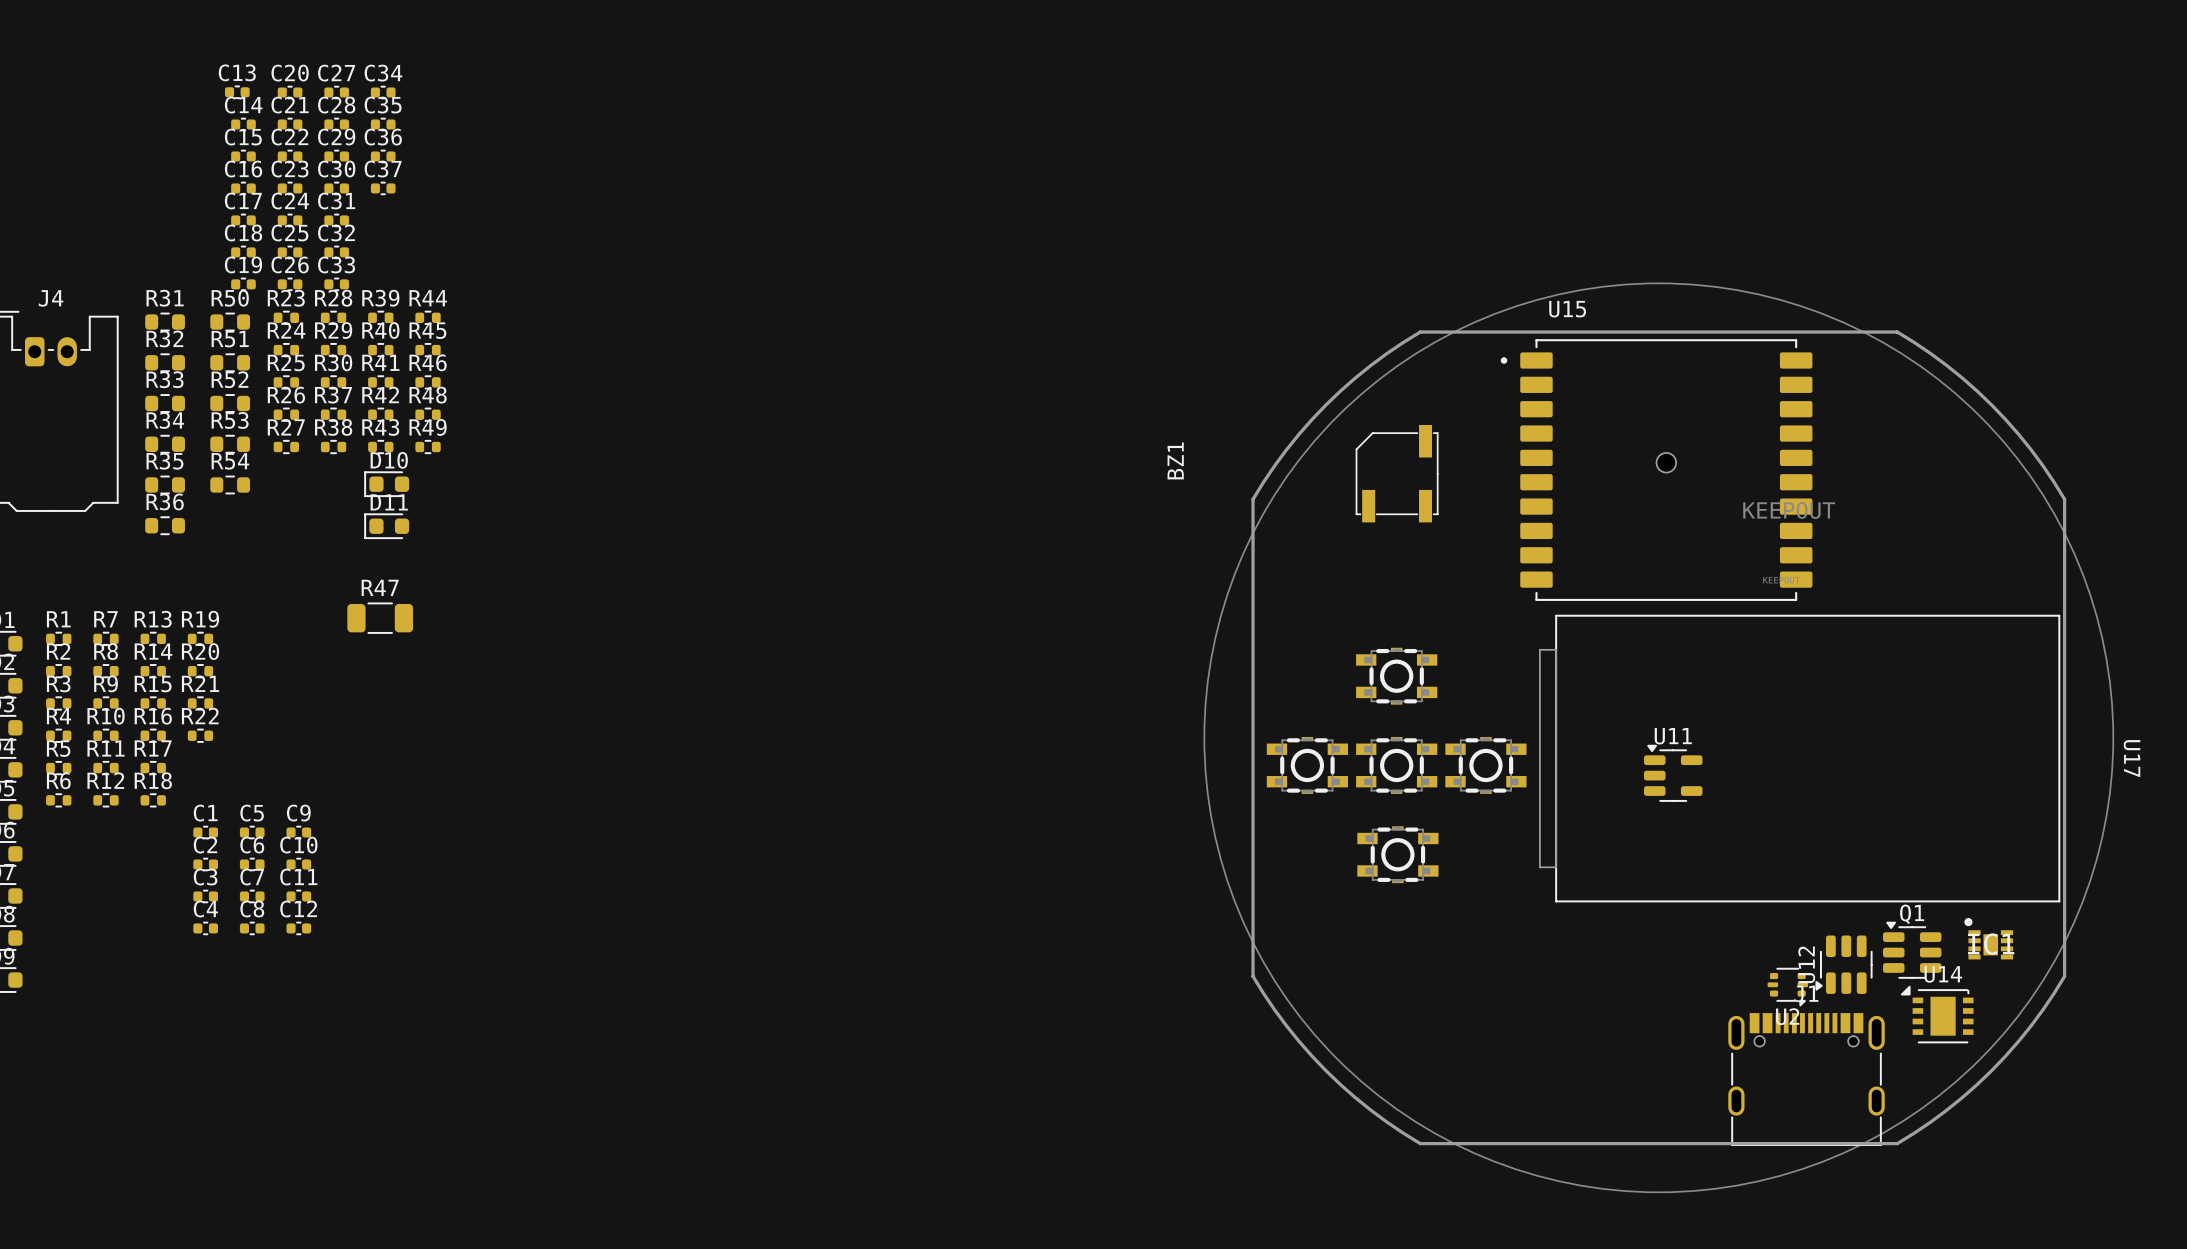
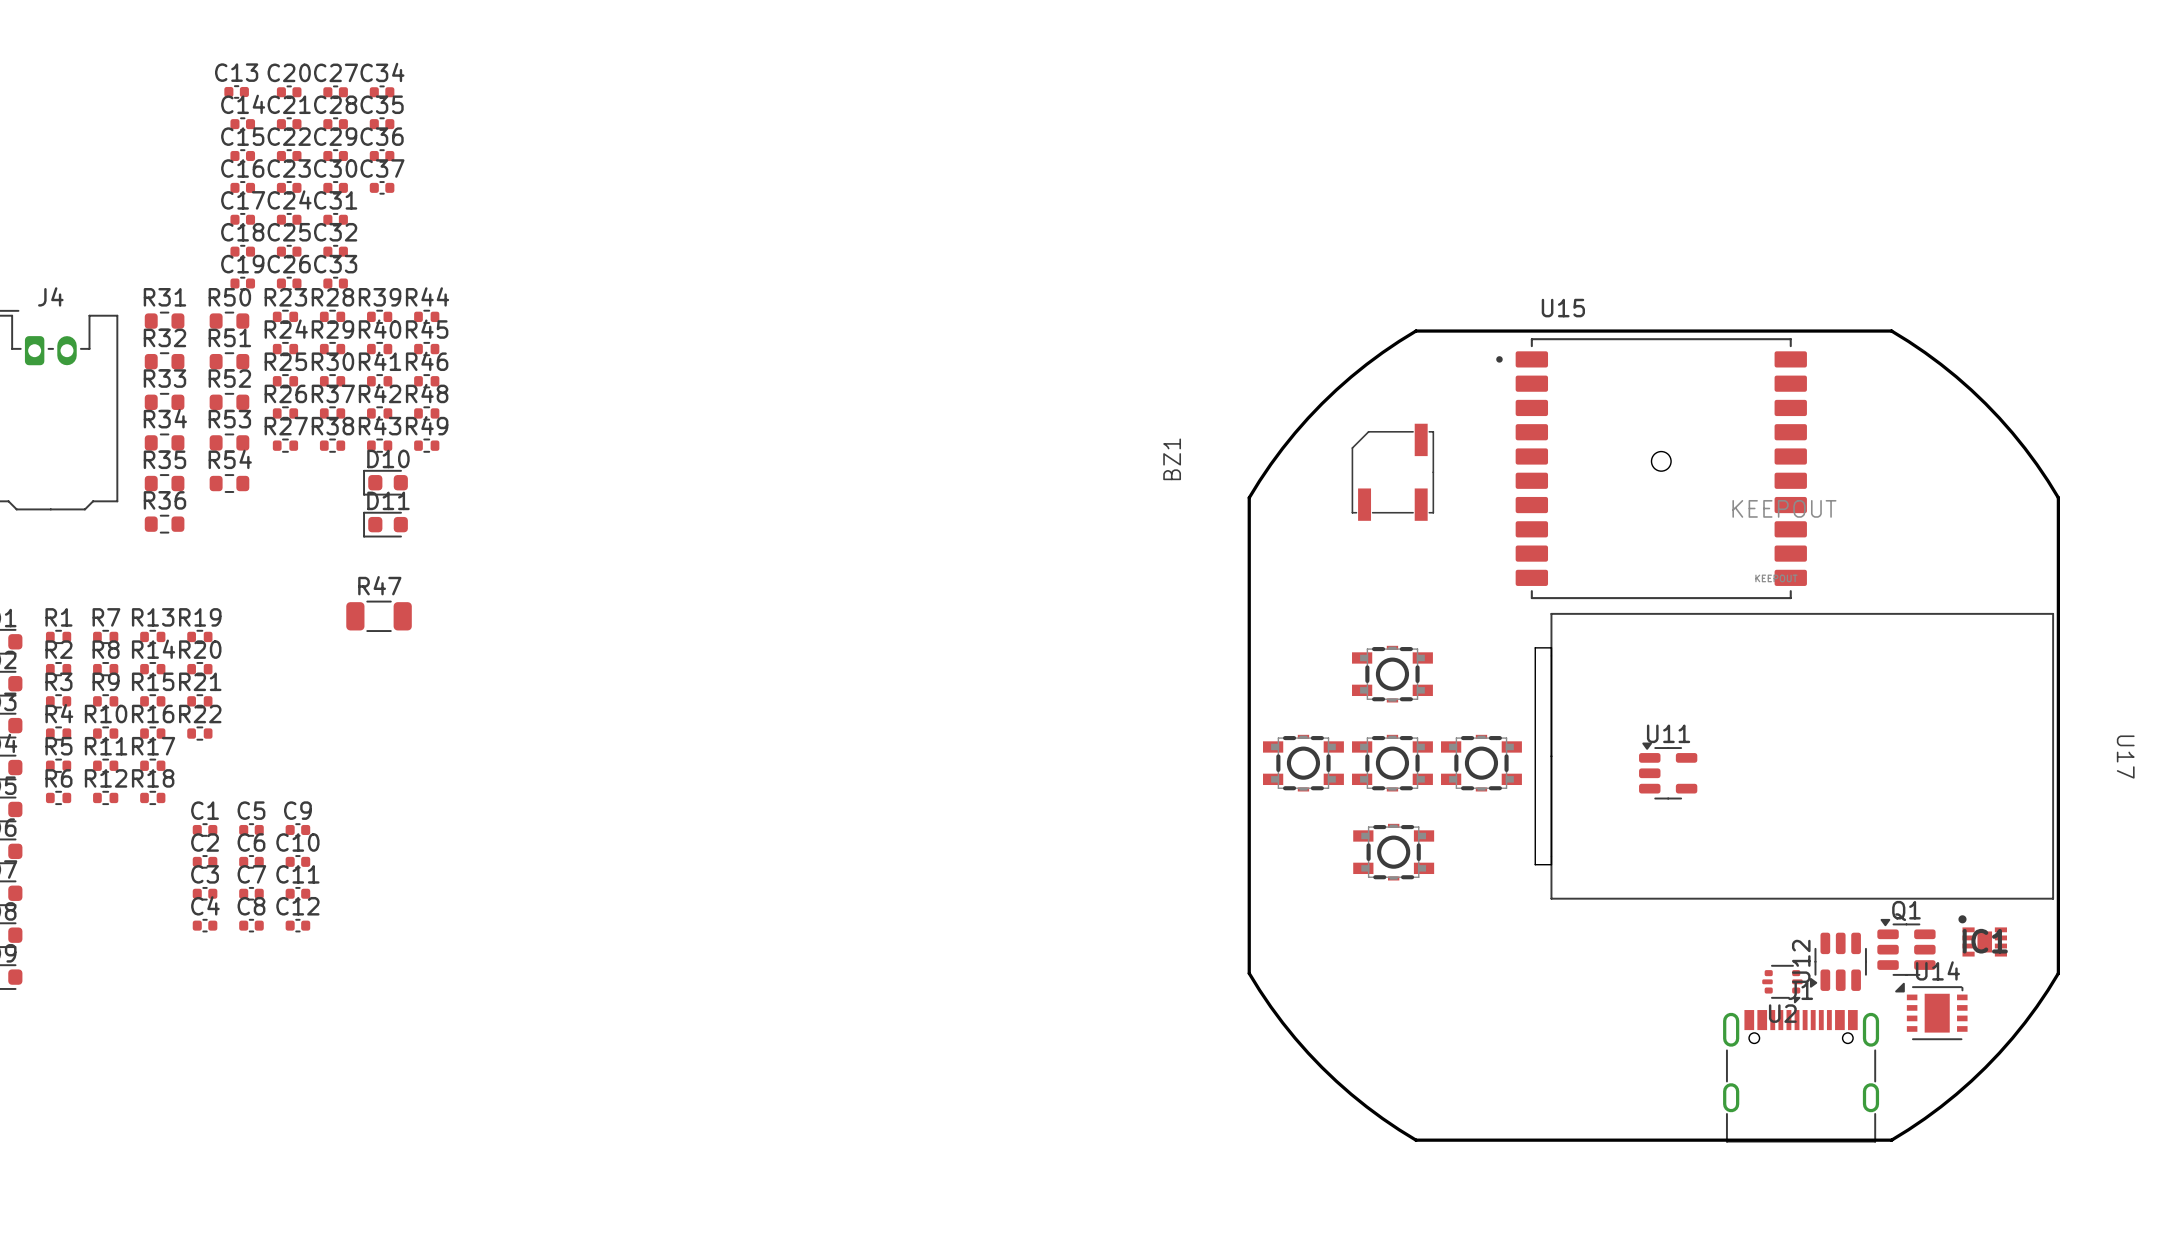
drawing: [1203, 282, 2114, 1193] -> none

